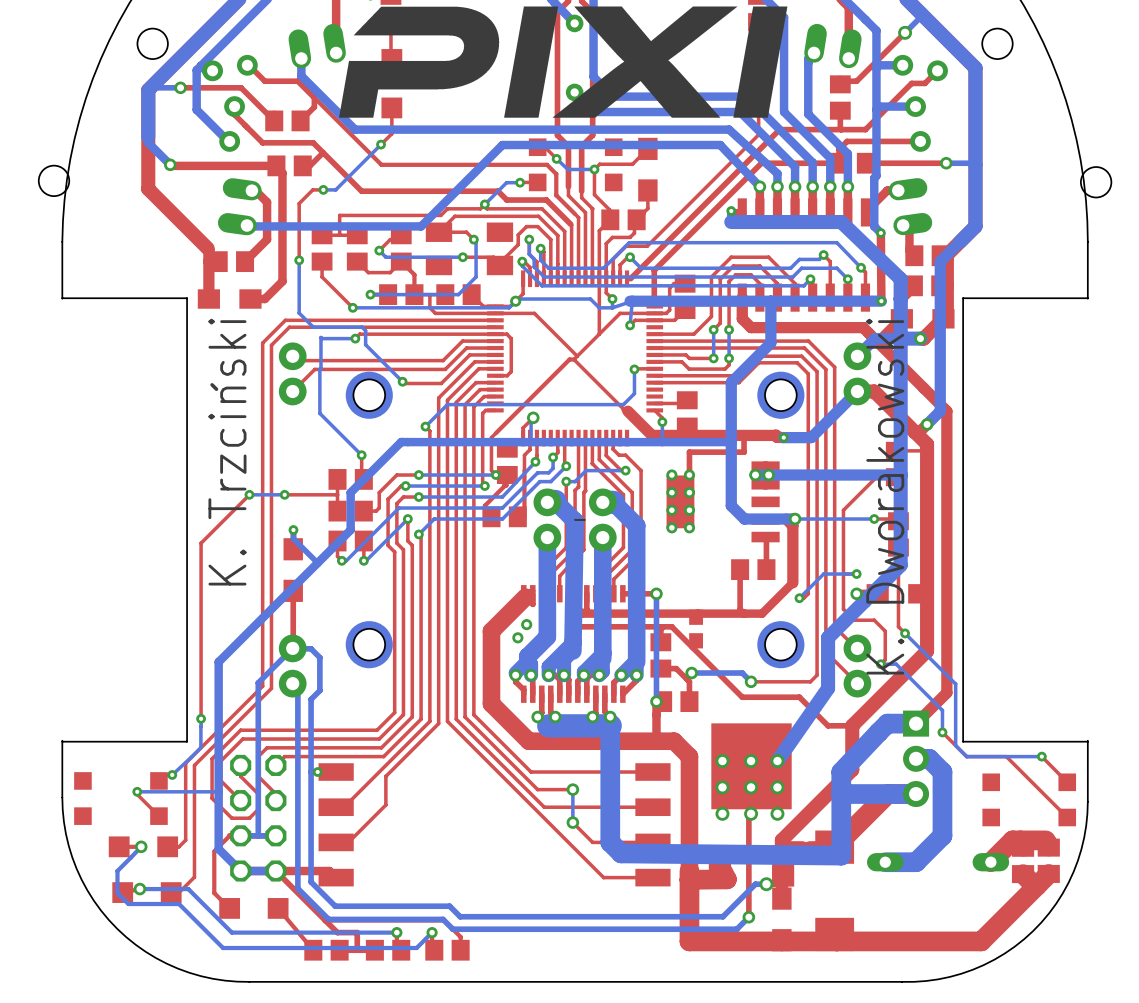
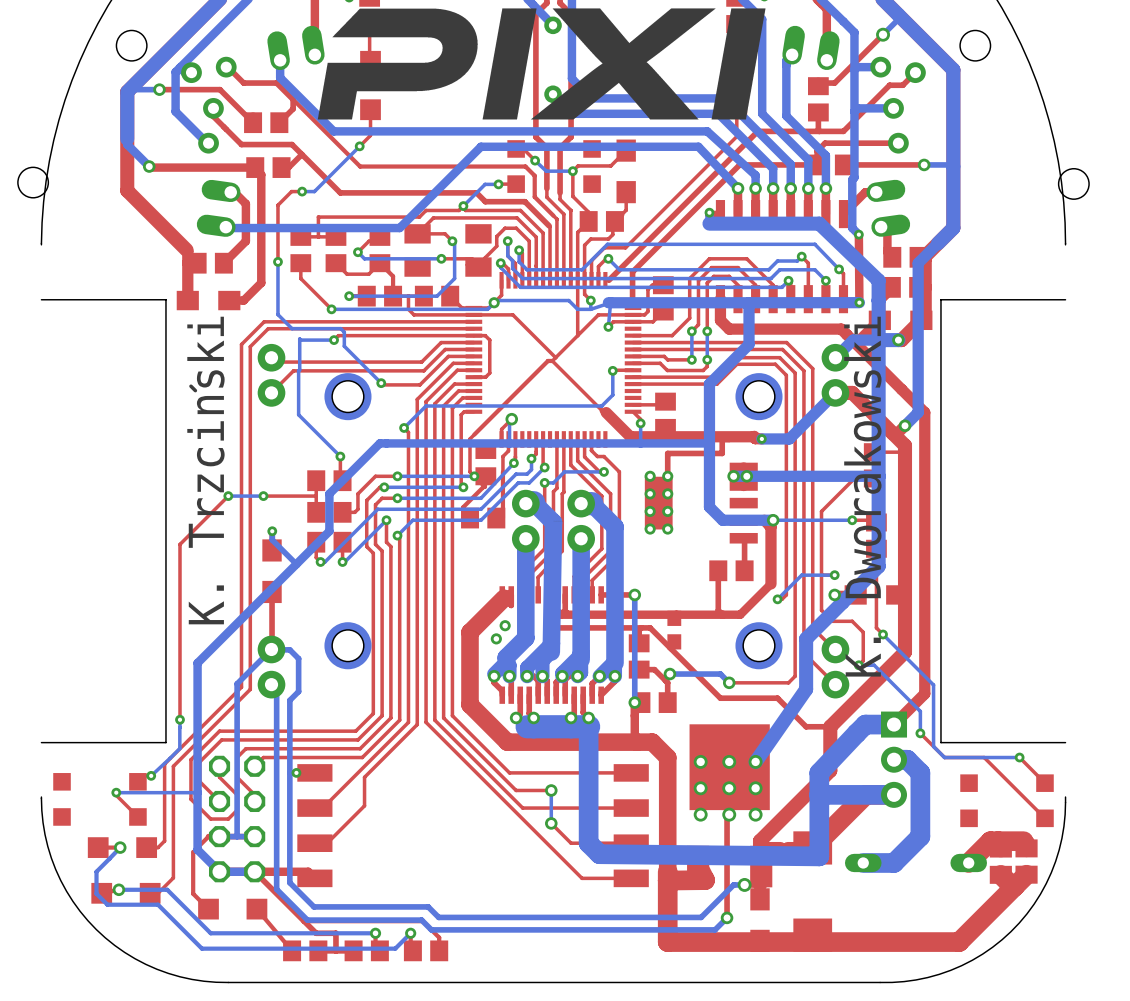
board edge: (62, 243) (62, 298) -> none
board edge: (1087, 243) (1087, 298) -> none
board edge: (62, 740) (62, 796) -> none
board edge: (1087, 740) (1087, 796) -> none

